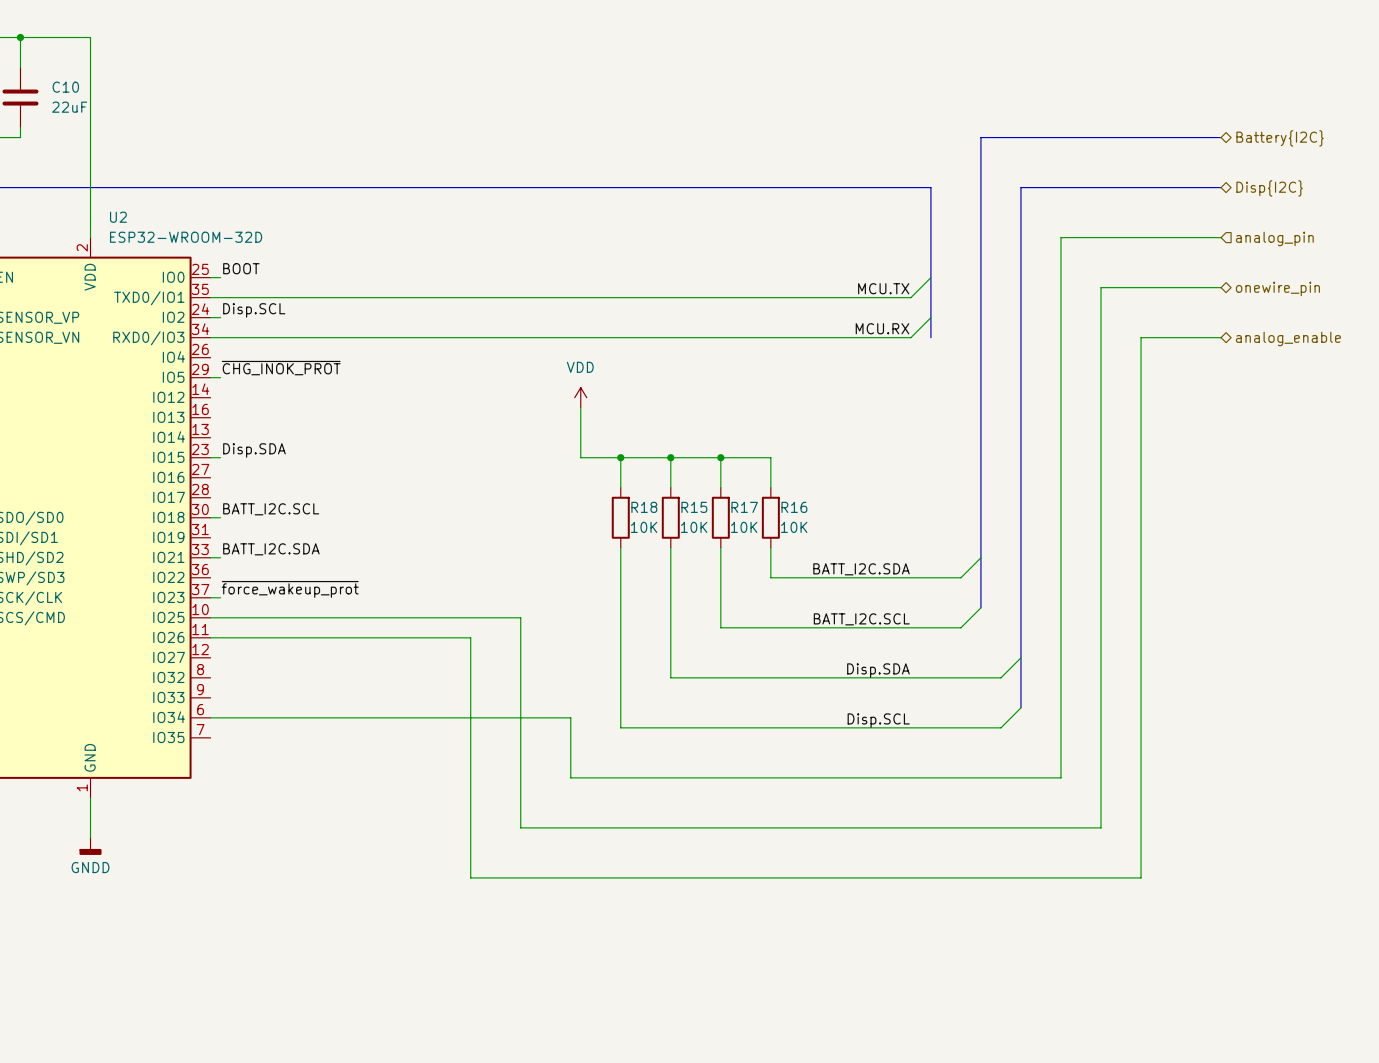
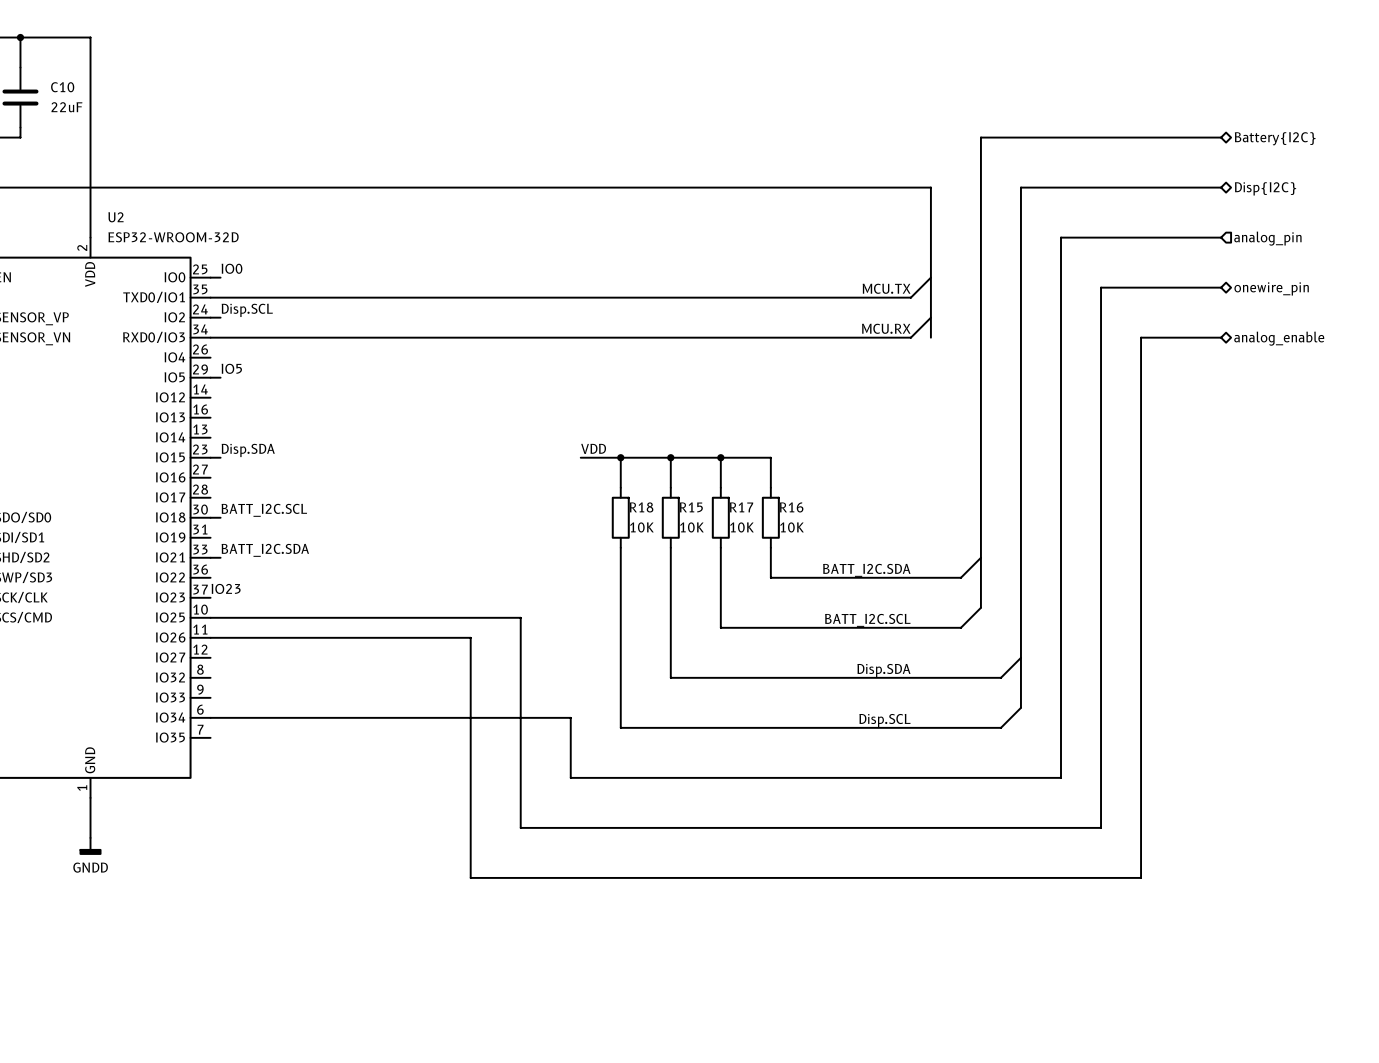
label: BOOT (241, 268) -> IO0 (232, 268)
label: ~{CHG_INOK_PROT} (281, 368) -> IO5 (231, 368)
power symbol: VDD (580, 397) -> none
wire: (580, 407) (580, 457) -> none
label: none -> VDD (593, 448)
label: none -> IO23 (226, 588)
label: ~{force_wakeup_prot} (290, 589) -> none
wire: (210, 597) (220, 597) -> none

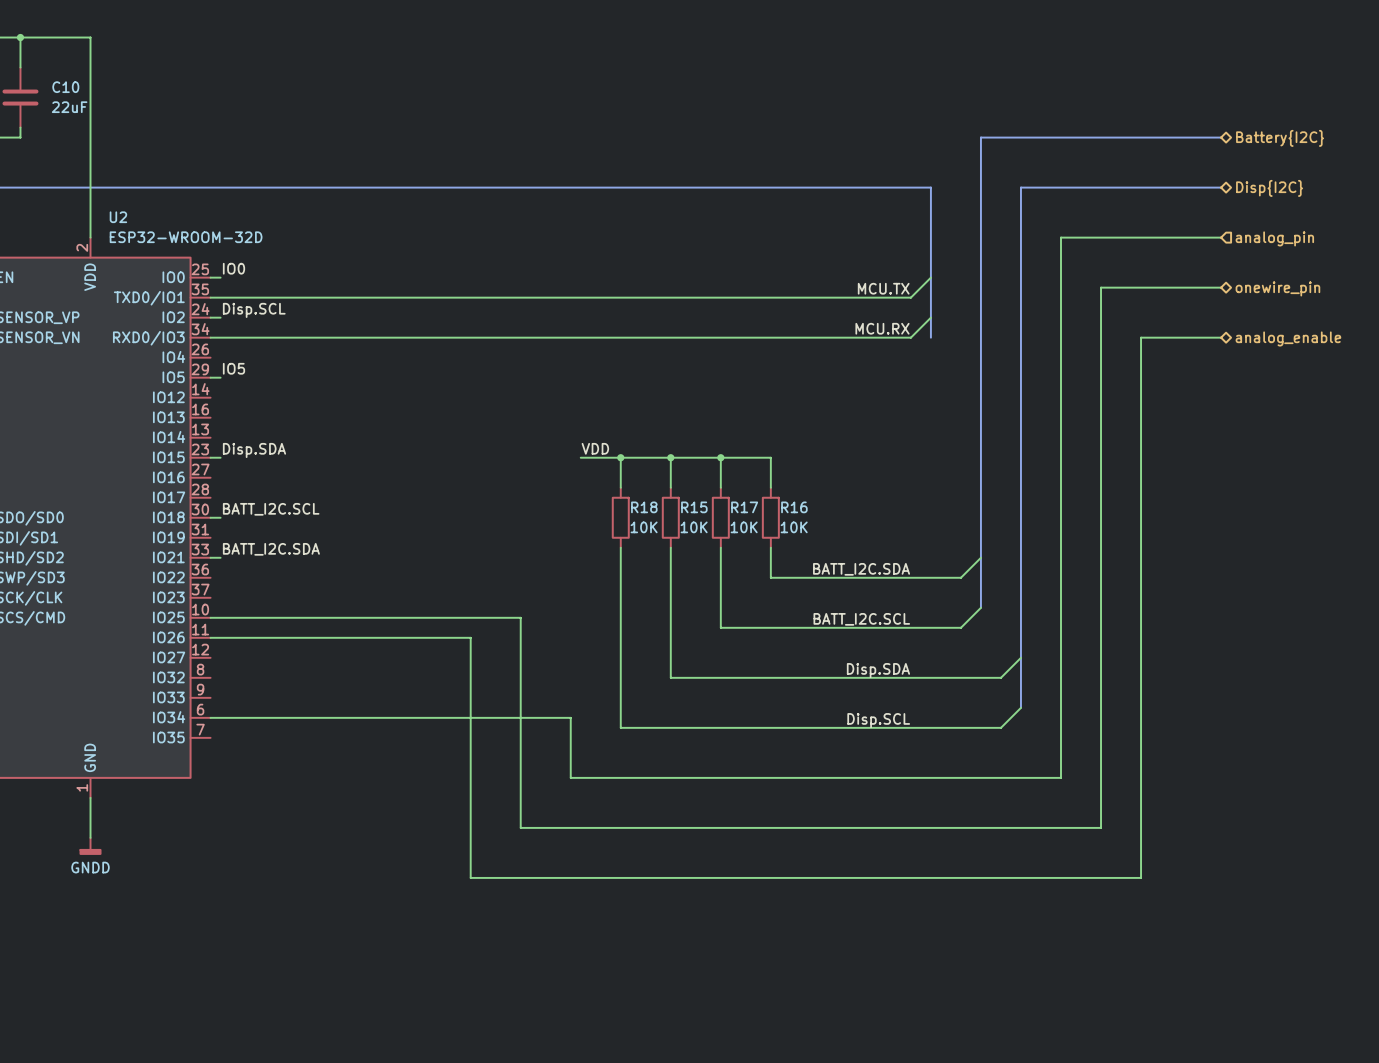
label: IO23 (226, 588) -> none

